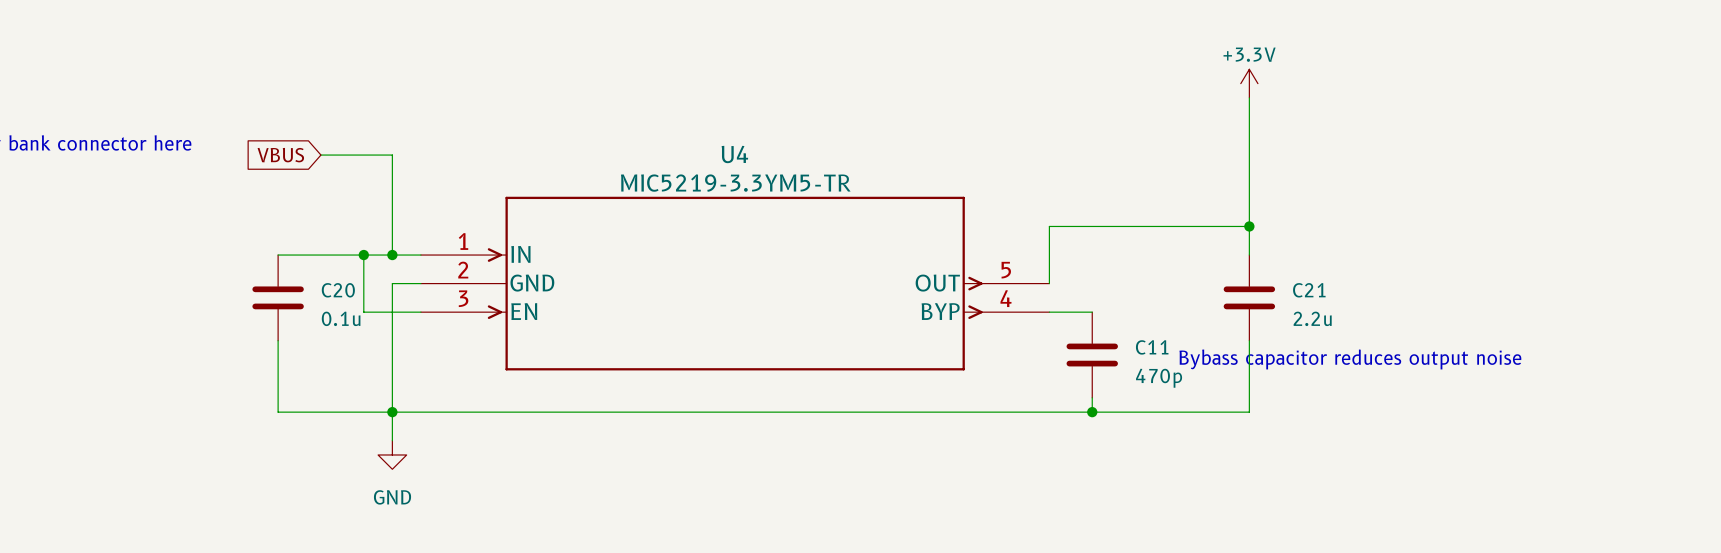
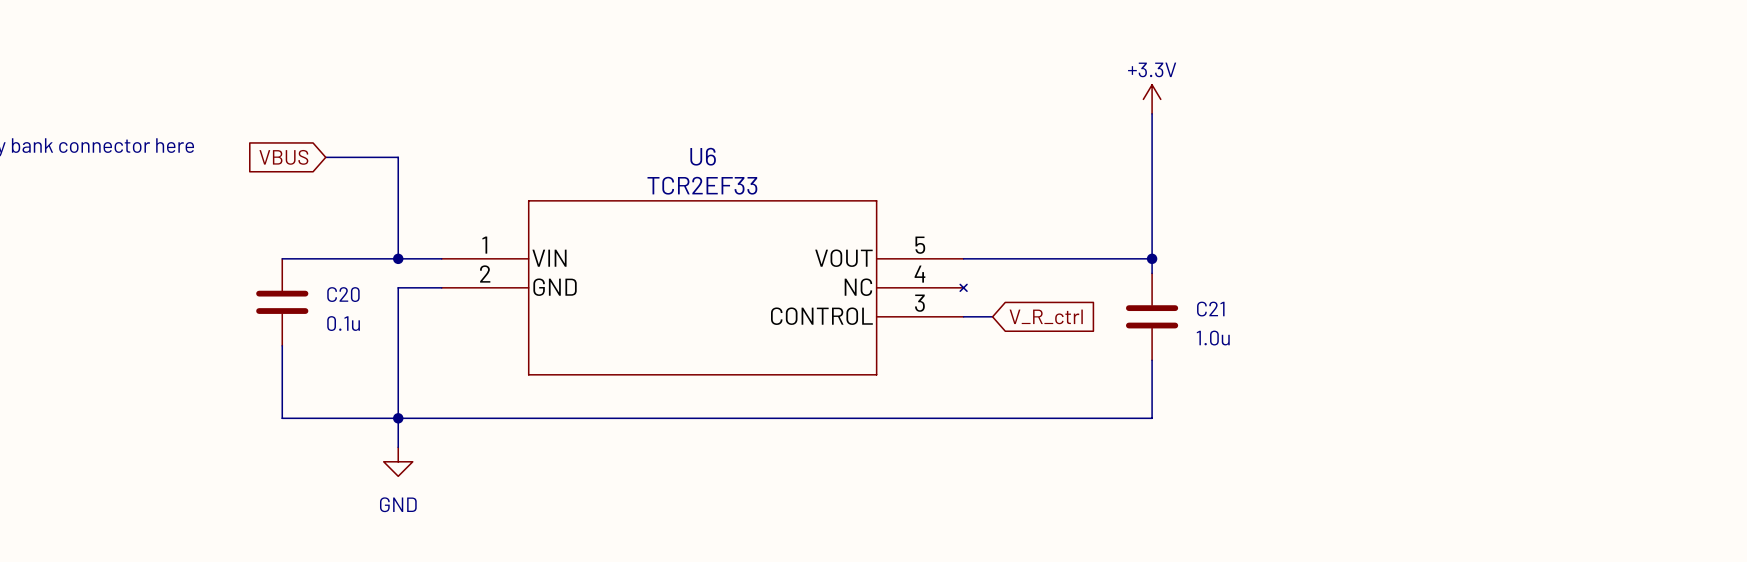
power symbol position: +3.3V (1249, 83) -> +3.3V (1152, 99)
wire: (1249, 97) (1249, 255) -> (1152, 113) (1152, 273)
wire: (1249, 226) (1049, 226) (1049, 283) -> none
junction: (1249, 226) -> none
wire: (363, 255) (363, 312) (420, 312) -> none
junction: (363, 255) -> none
wire: none -> (963, 258) (1152, 258)
junction: none -> (1152, 258)
U6: none -> TCR2EF33 (704, 287)
U4: MIC5219-3.3YM5-TR (735, 283) -> none
C21 position: (1249, 297) -> (1152, 316)
wire: (1049, 312) (1092, 312) -> none
global label: none -> V_R_ctrl (1046, 316)
C21 value: 2.2u (1312, 318) -> 1.0u (1213, 338)
wire: (1249, 340) (1249, 412) (1135, 412) -> (1152, 360) (1152, 418)
C11: 470p (1092, 355) -> none
text: Bybass capacitor reduces output noise (1350, 359) -> none
wire: (1092, 397) (1092, 412) -> none
junction: (1092, 412) -> none

